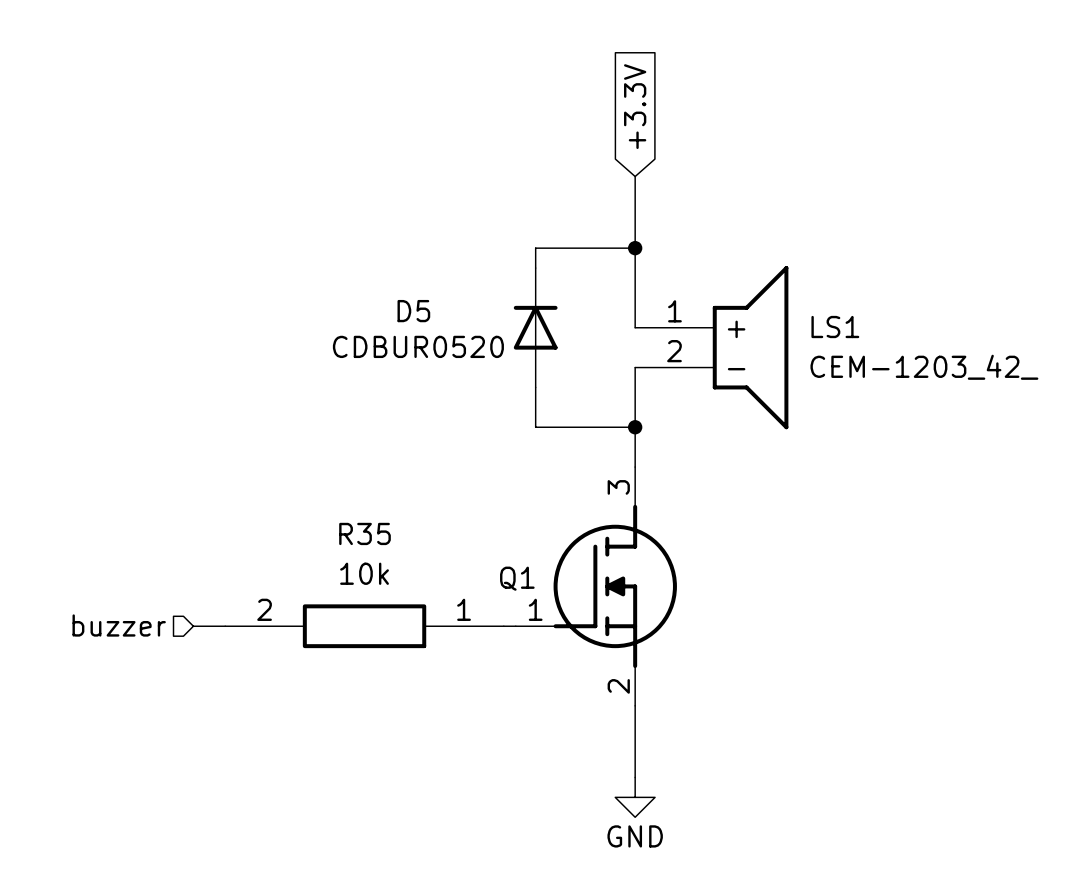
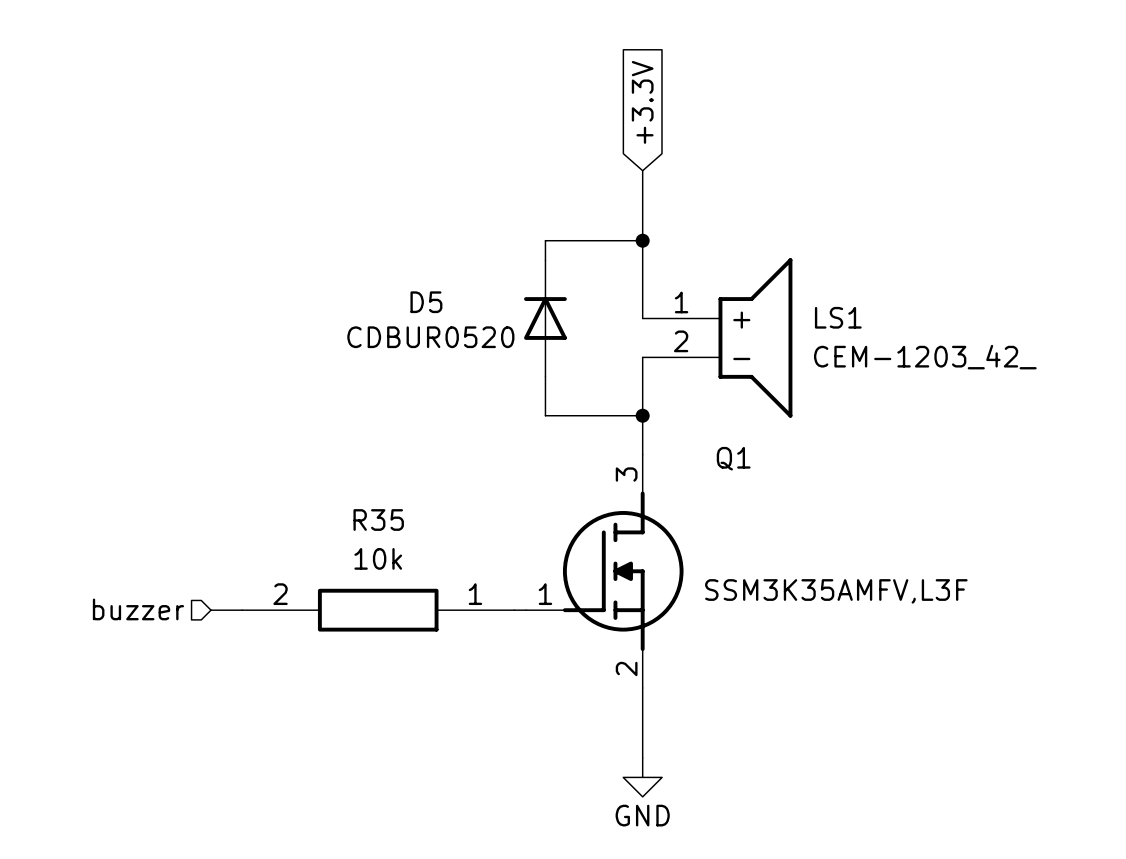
Q1 name position: Q1 (517, 578) -> Q1 (733, 458)
Q1 value: none -> SSM3K35AMFV,L3F (836, 591)

